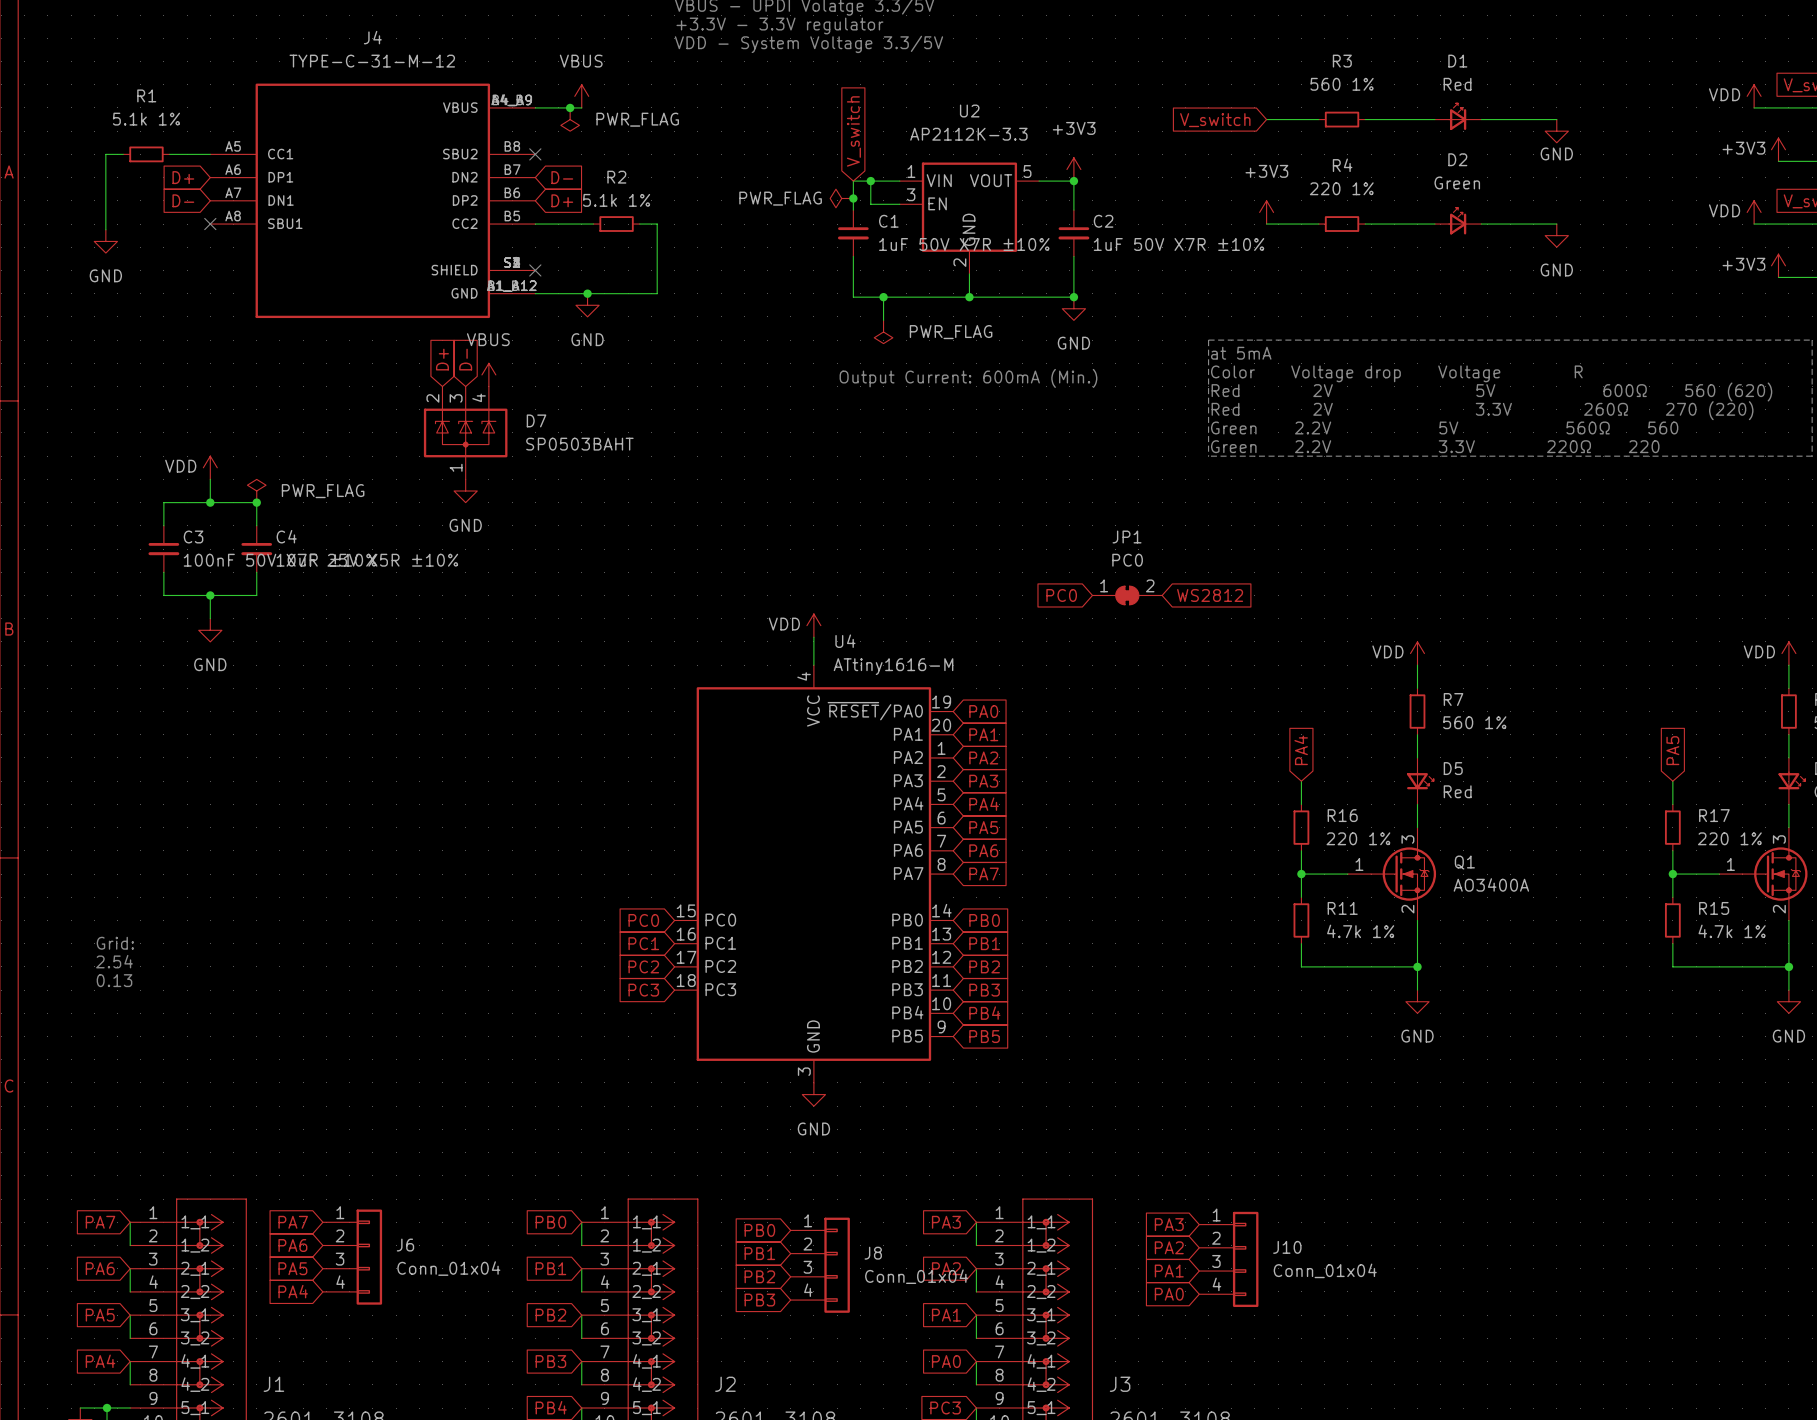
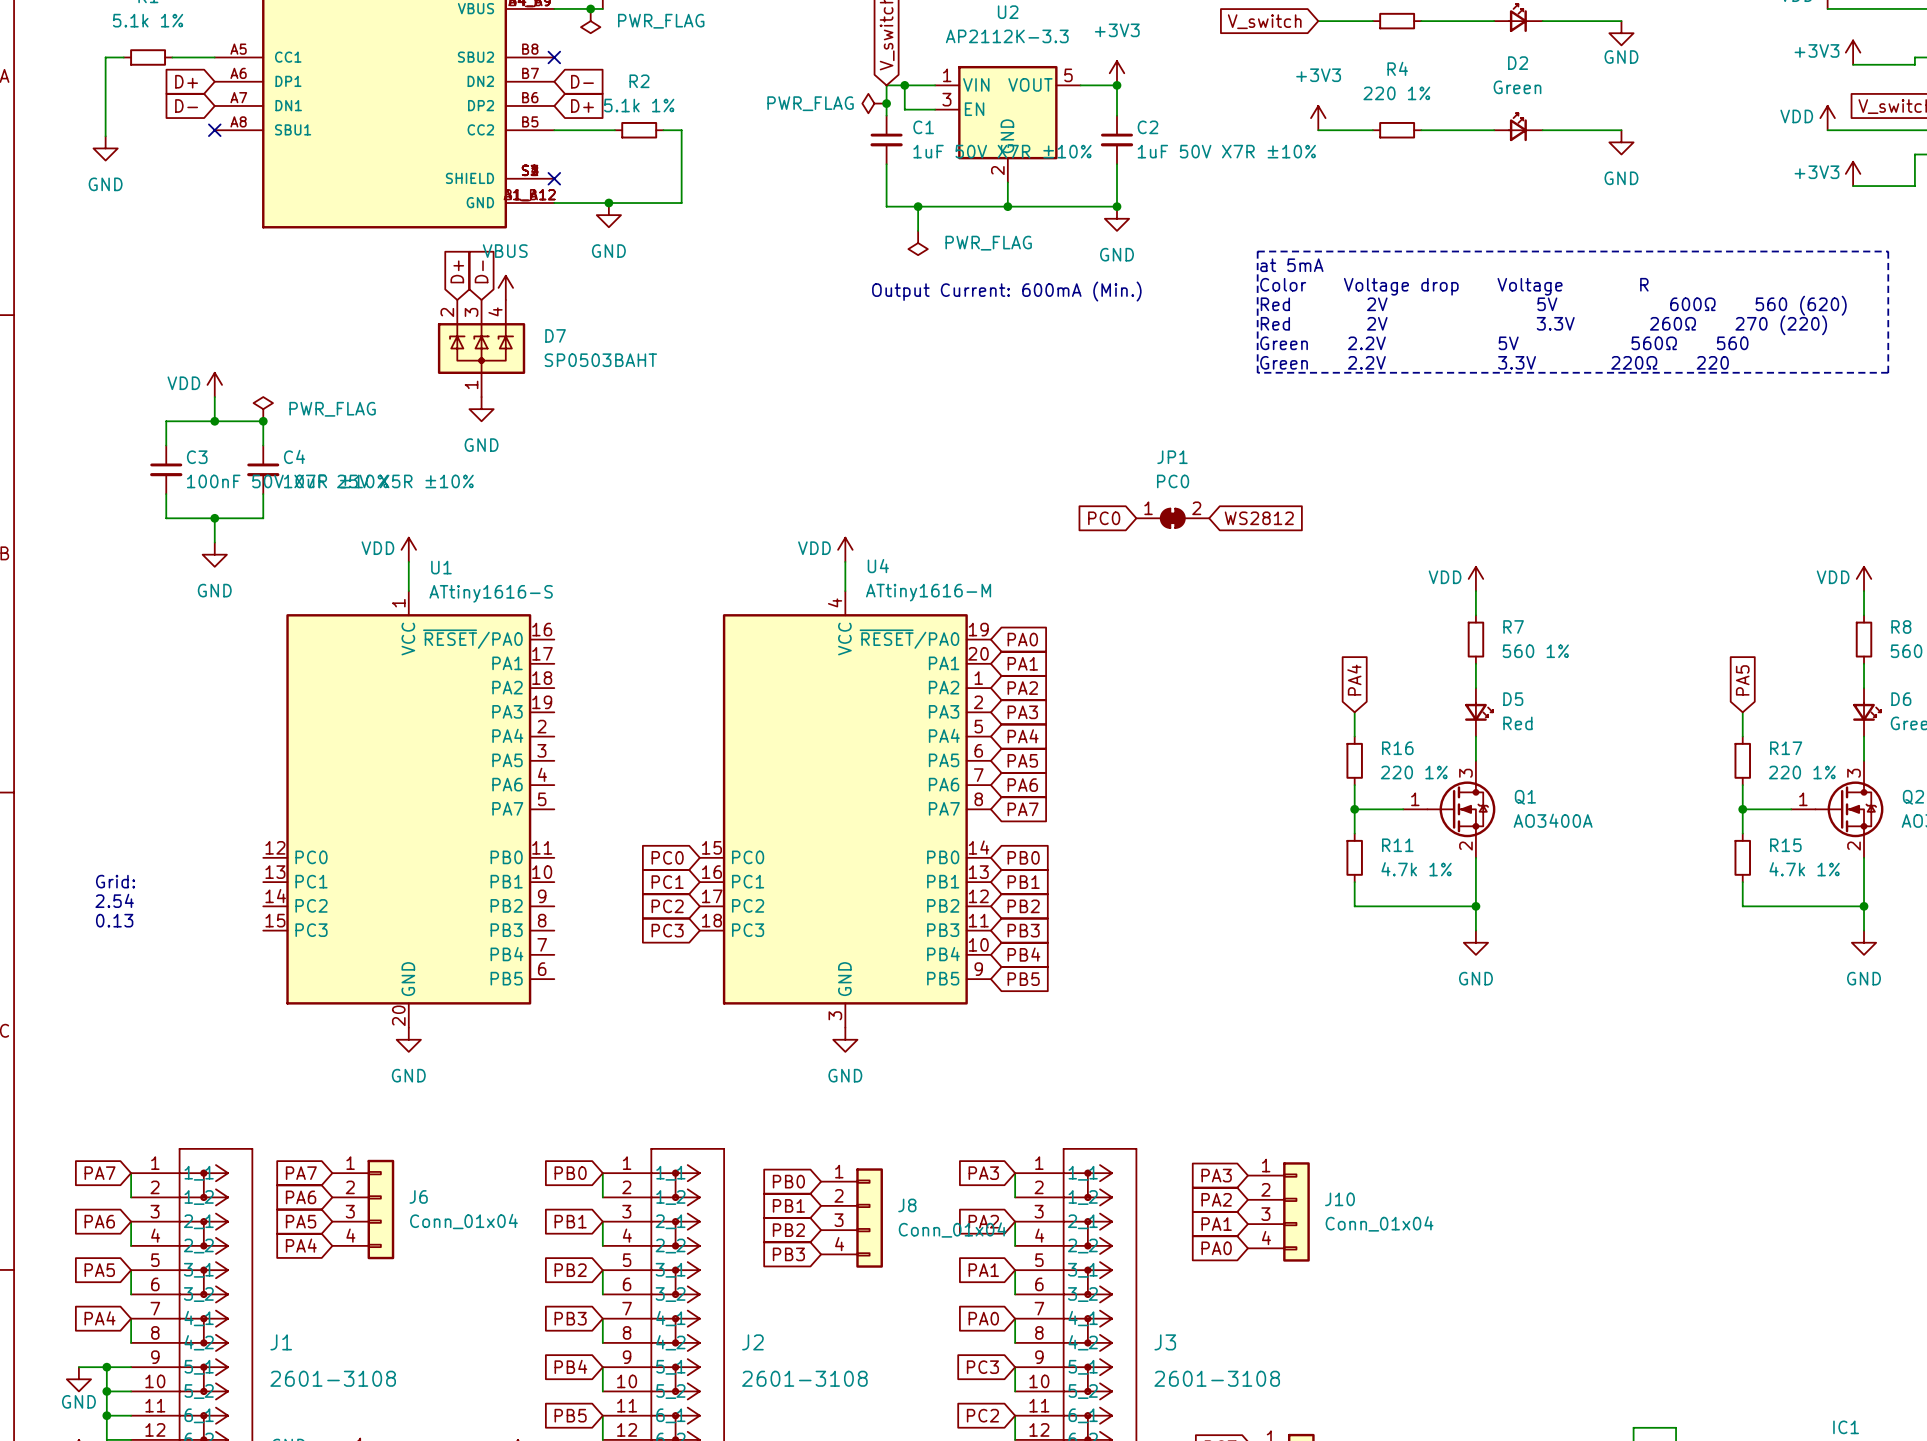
power symbol: none -> VDD (408, 549)
wire: none -> (408, 561) (408, 591)
U1: none -> ATtiny1616-S (408, 809)
power symbol: none -> GND (408, 1039)

